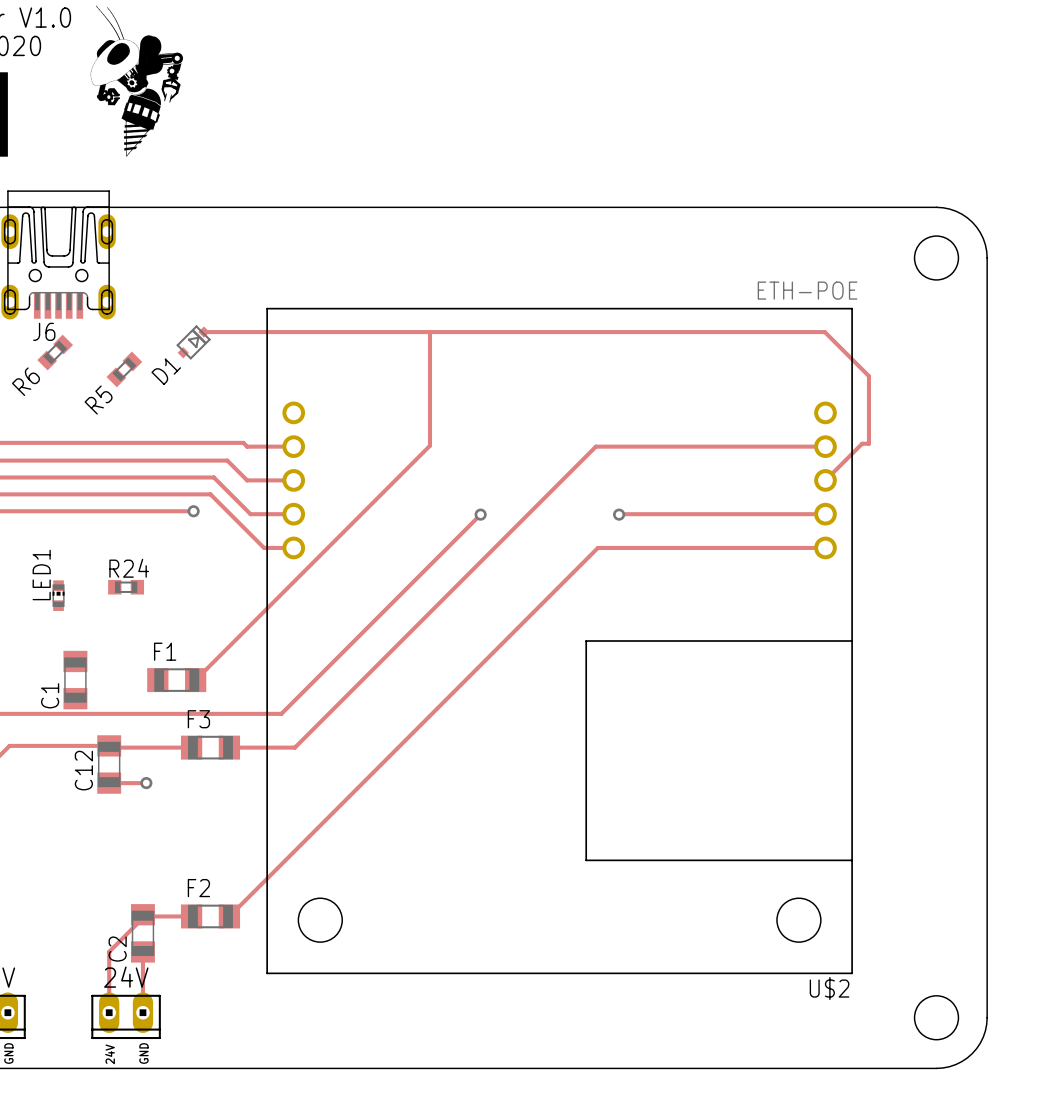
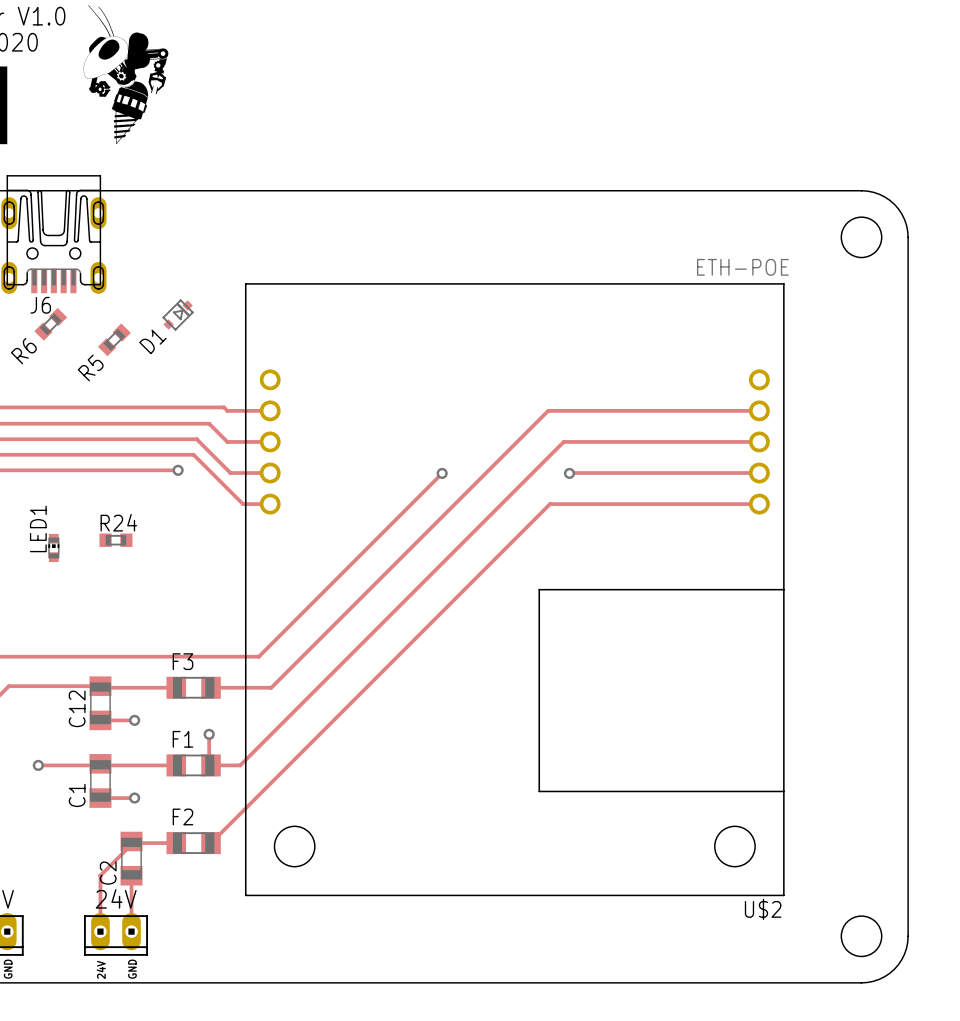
track: (203, 332) (824, 332) (868, 376) (868, 443) (862, 443) (825, 480) -> (209, 734) (209, 763) (211, 765) (240, 765) (563, 441) (759, 441)
track: (429, 332) (429, 445) (195, 680) -> none
C1 position: (75, 680) -> (100, 780)
F1 position: (176, 680) -> (193, 765)
via: none -> (209, 734)
track: none -> (38, 765) (98, 765) (100, 763) (102, 765) (176, 765)
via: none -> (38, 765)
track: none -> (100, 798) (134, 798)
via: none -> (134, 798)

